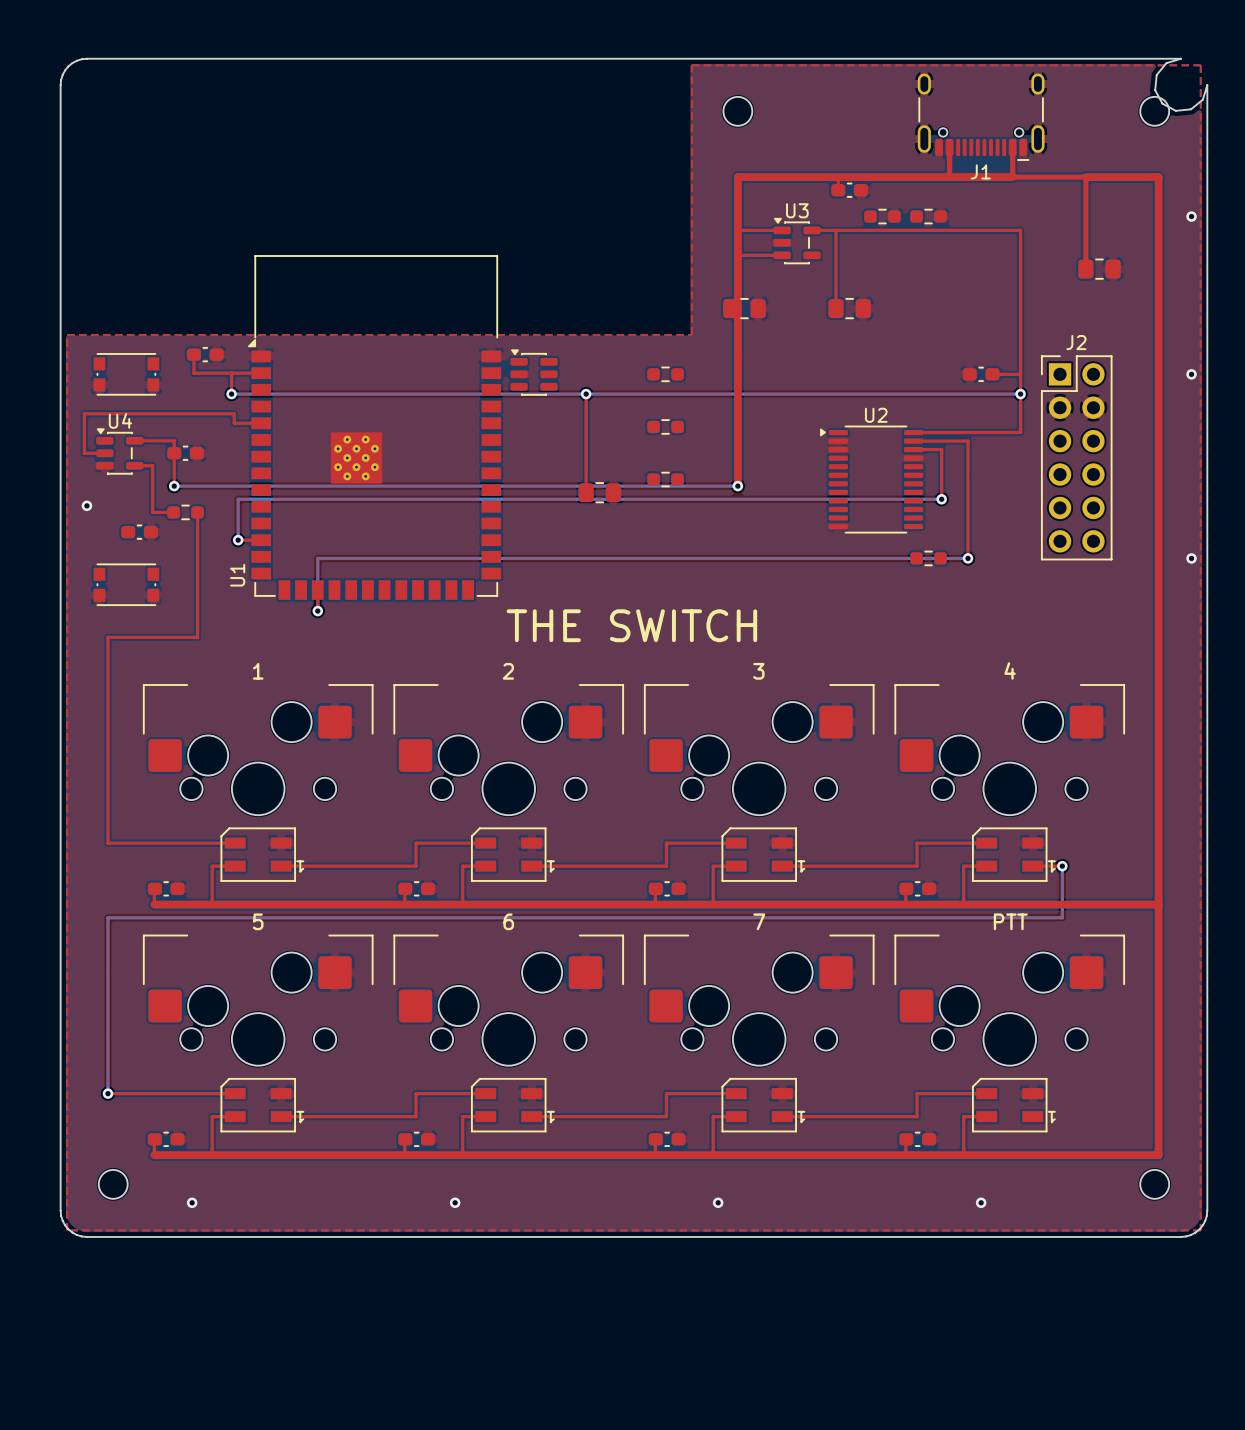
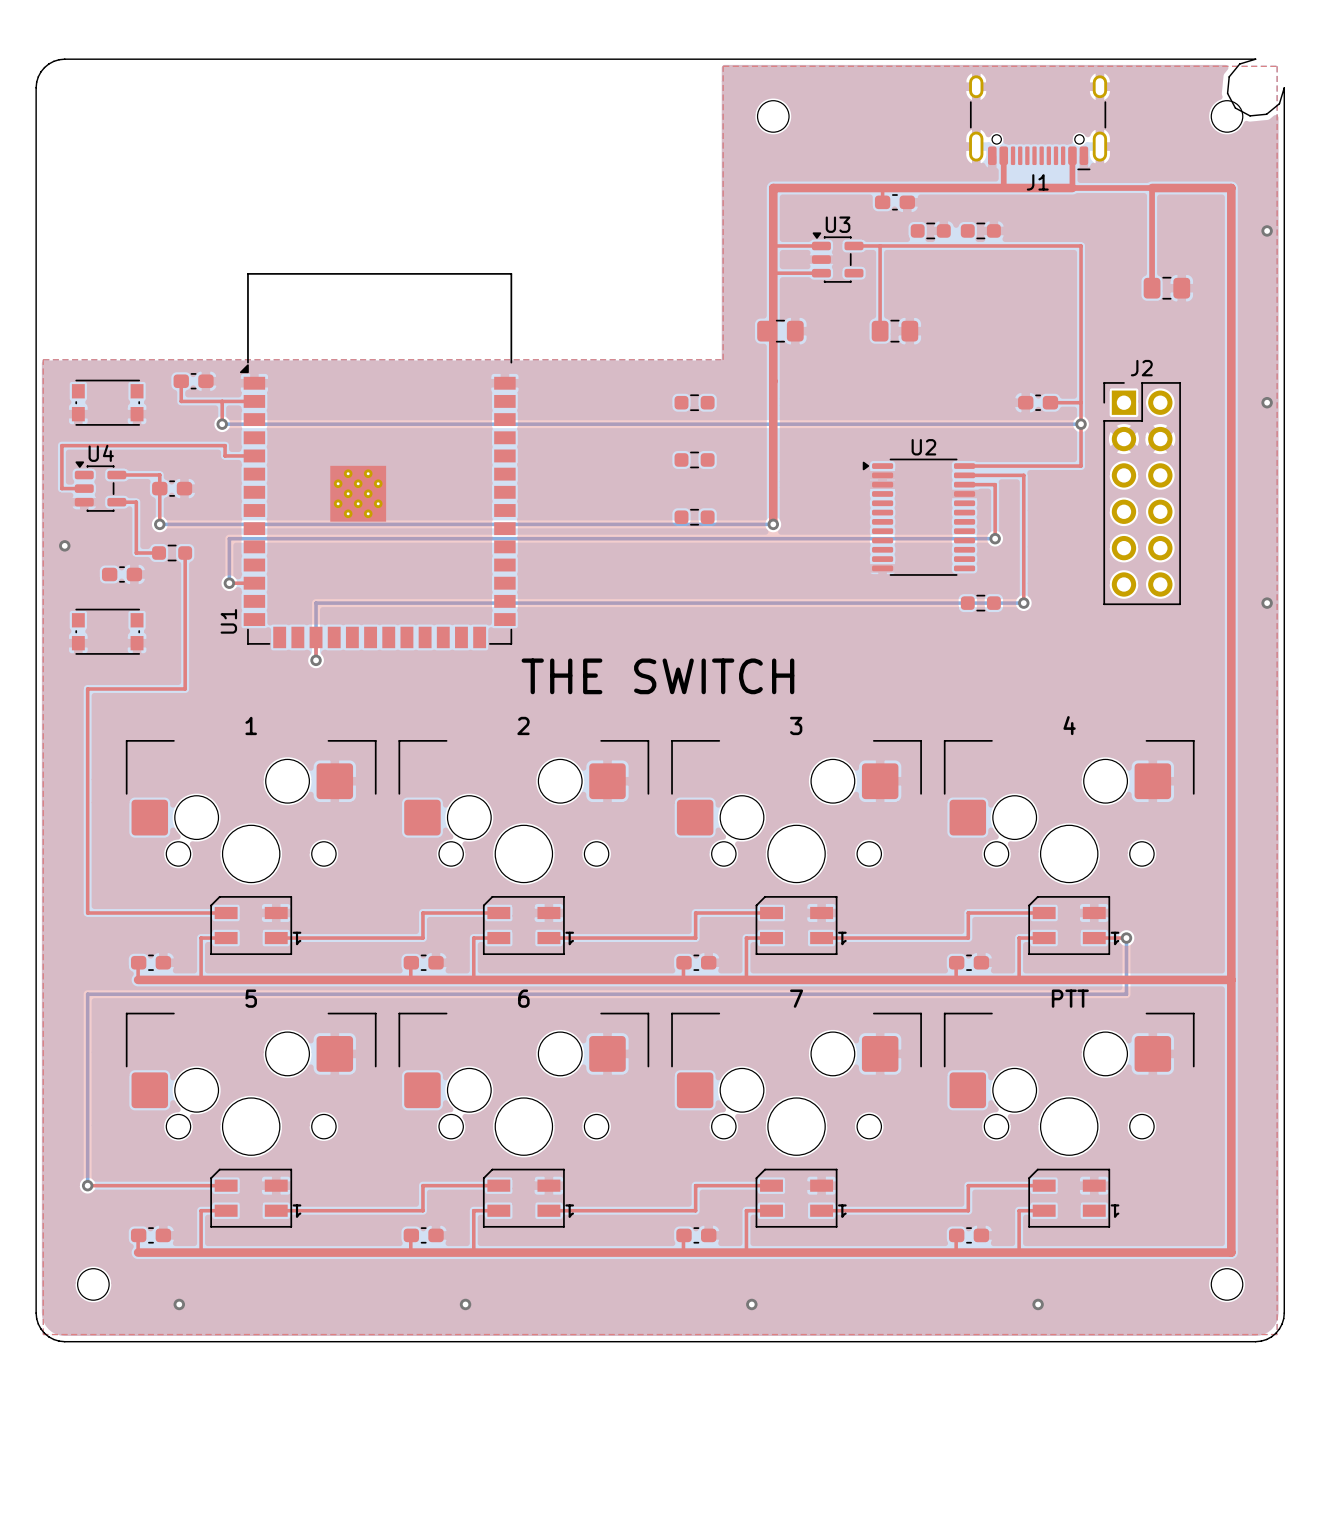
part: (534, 372) -> none
top track: (586, 394) (586, 492) -> none
via: (586, 394) -> none
part: (599, 492) -> none

